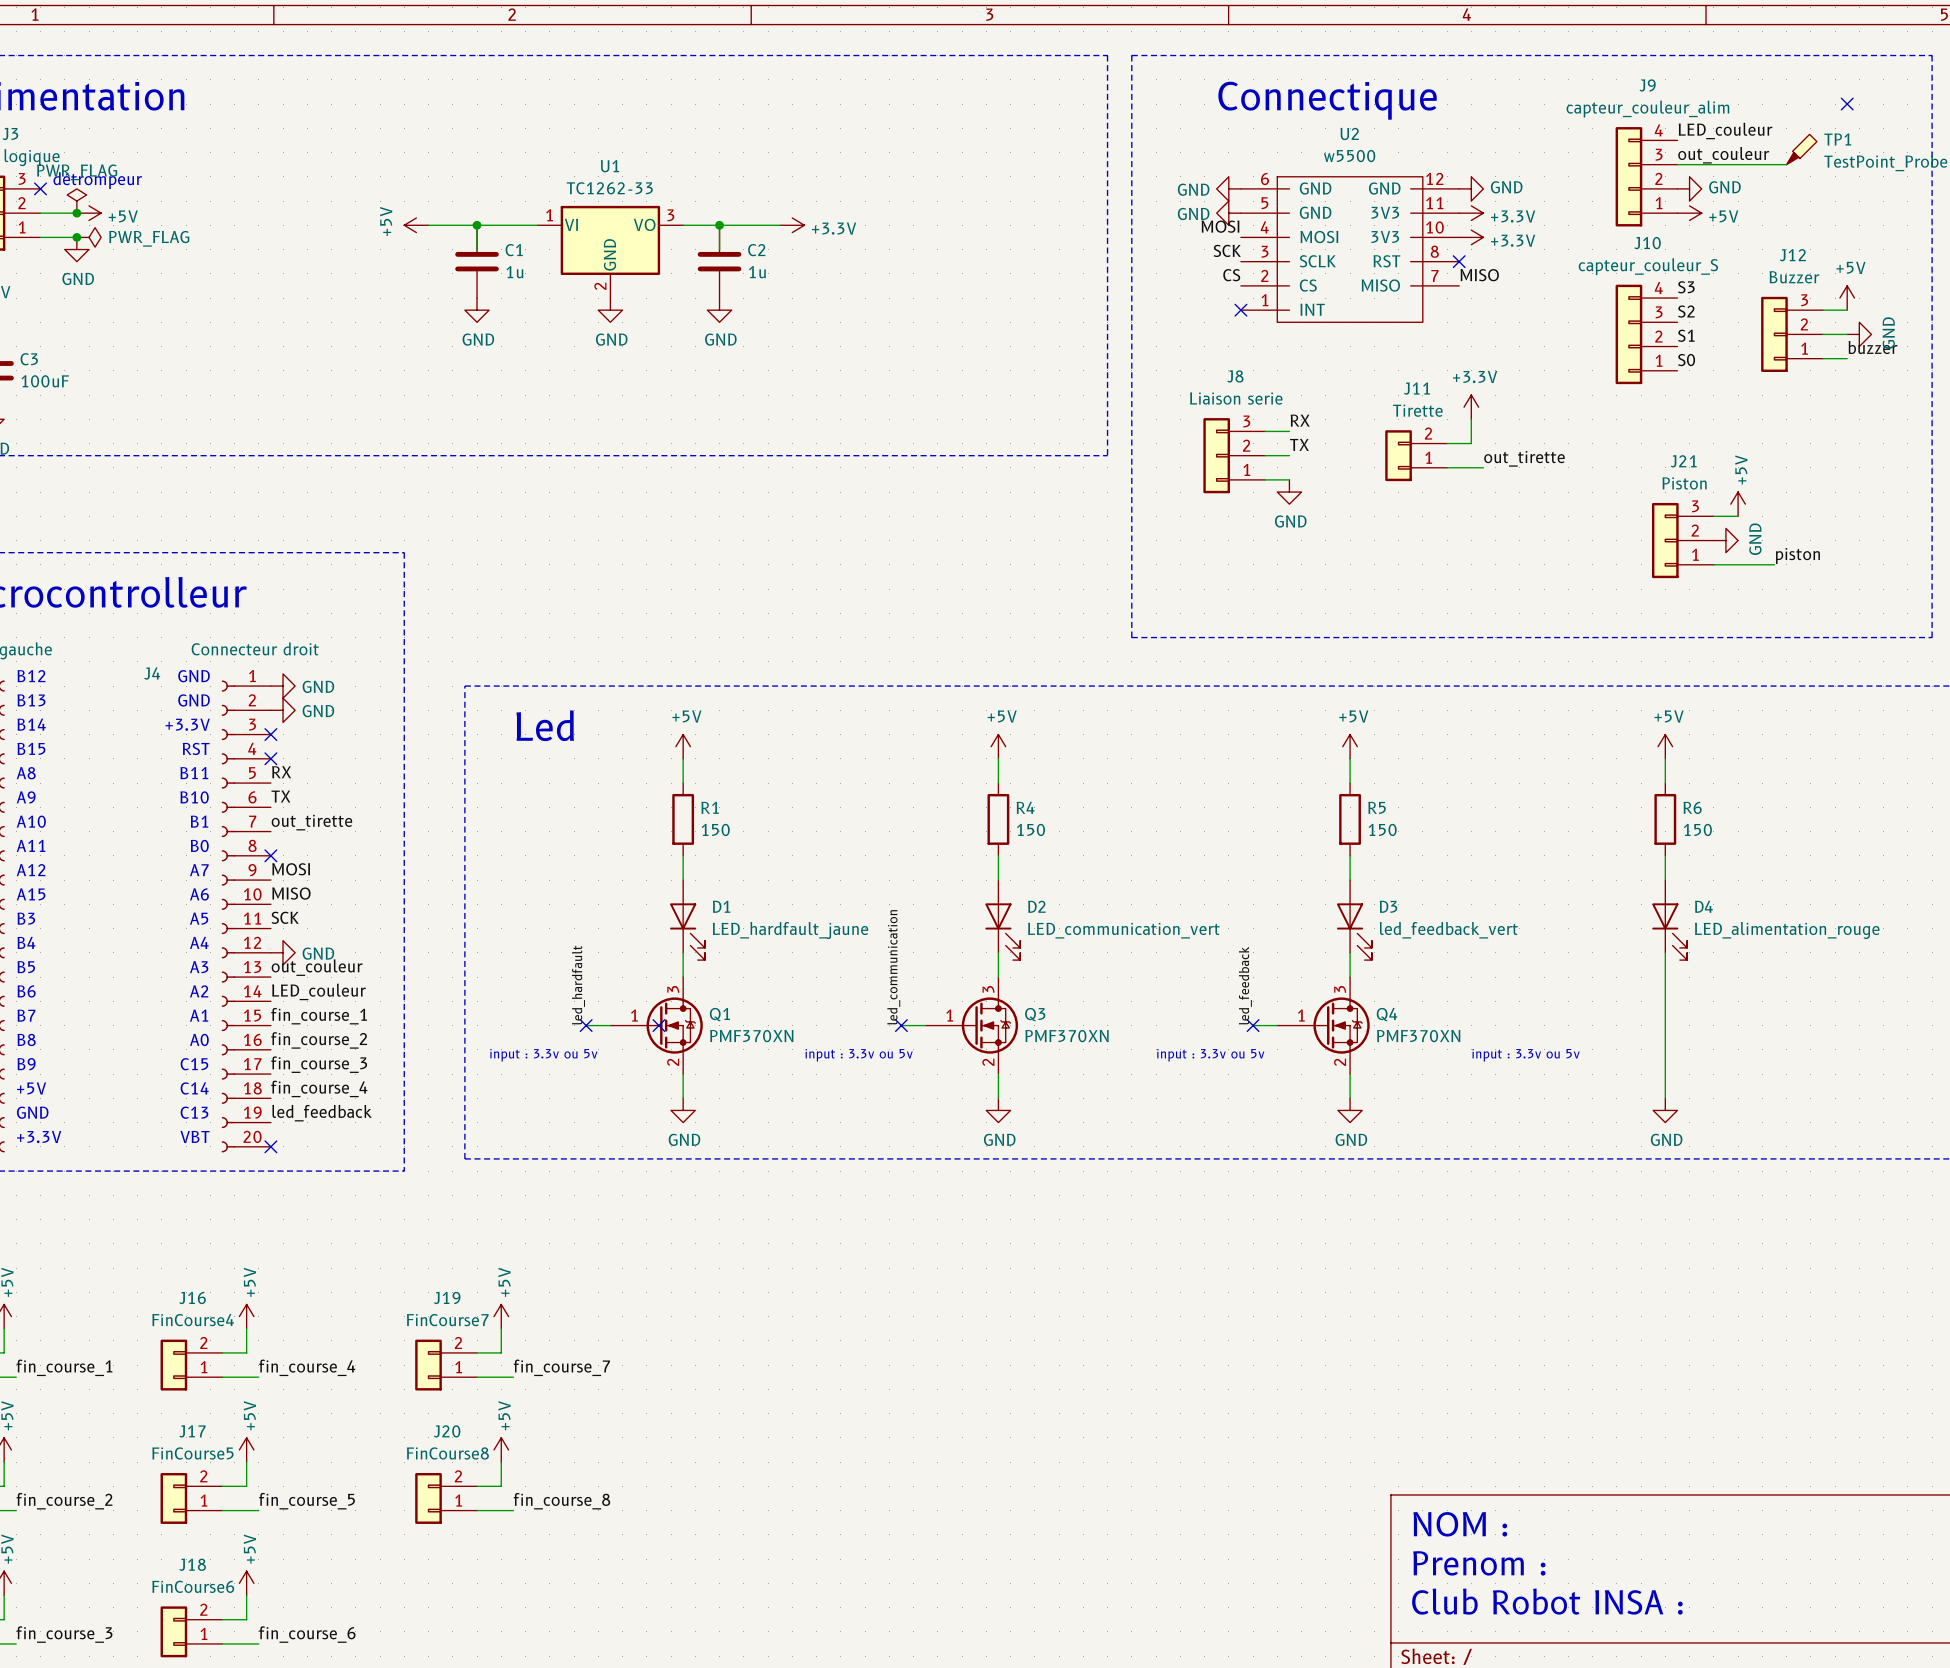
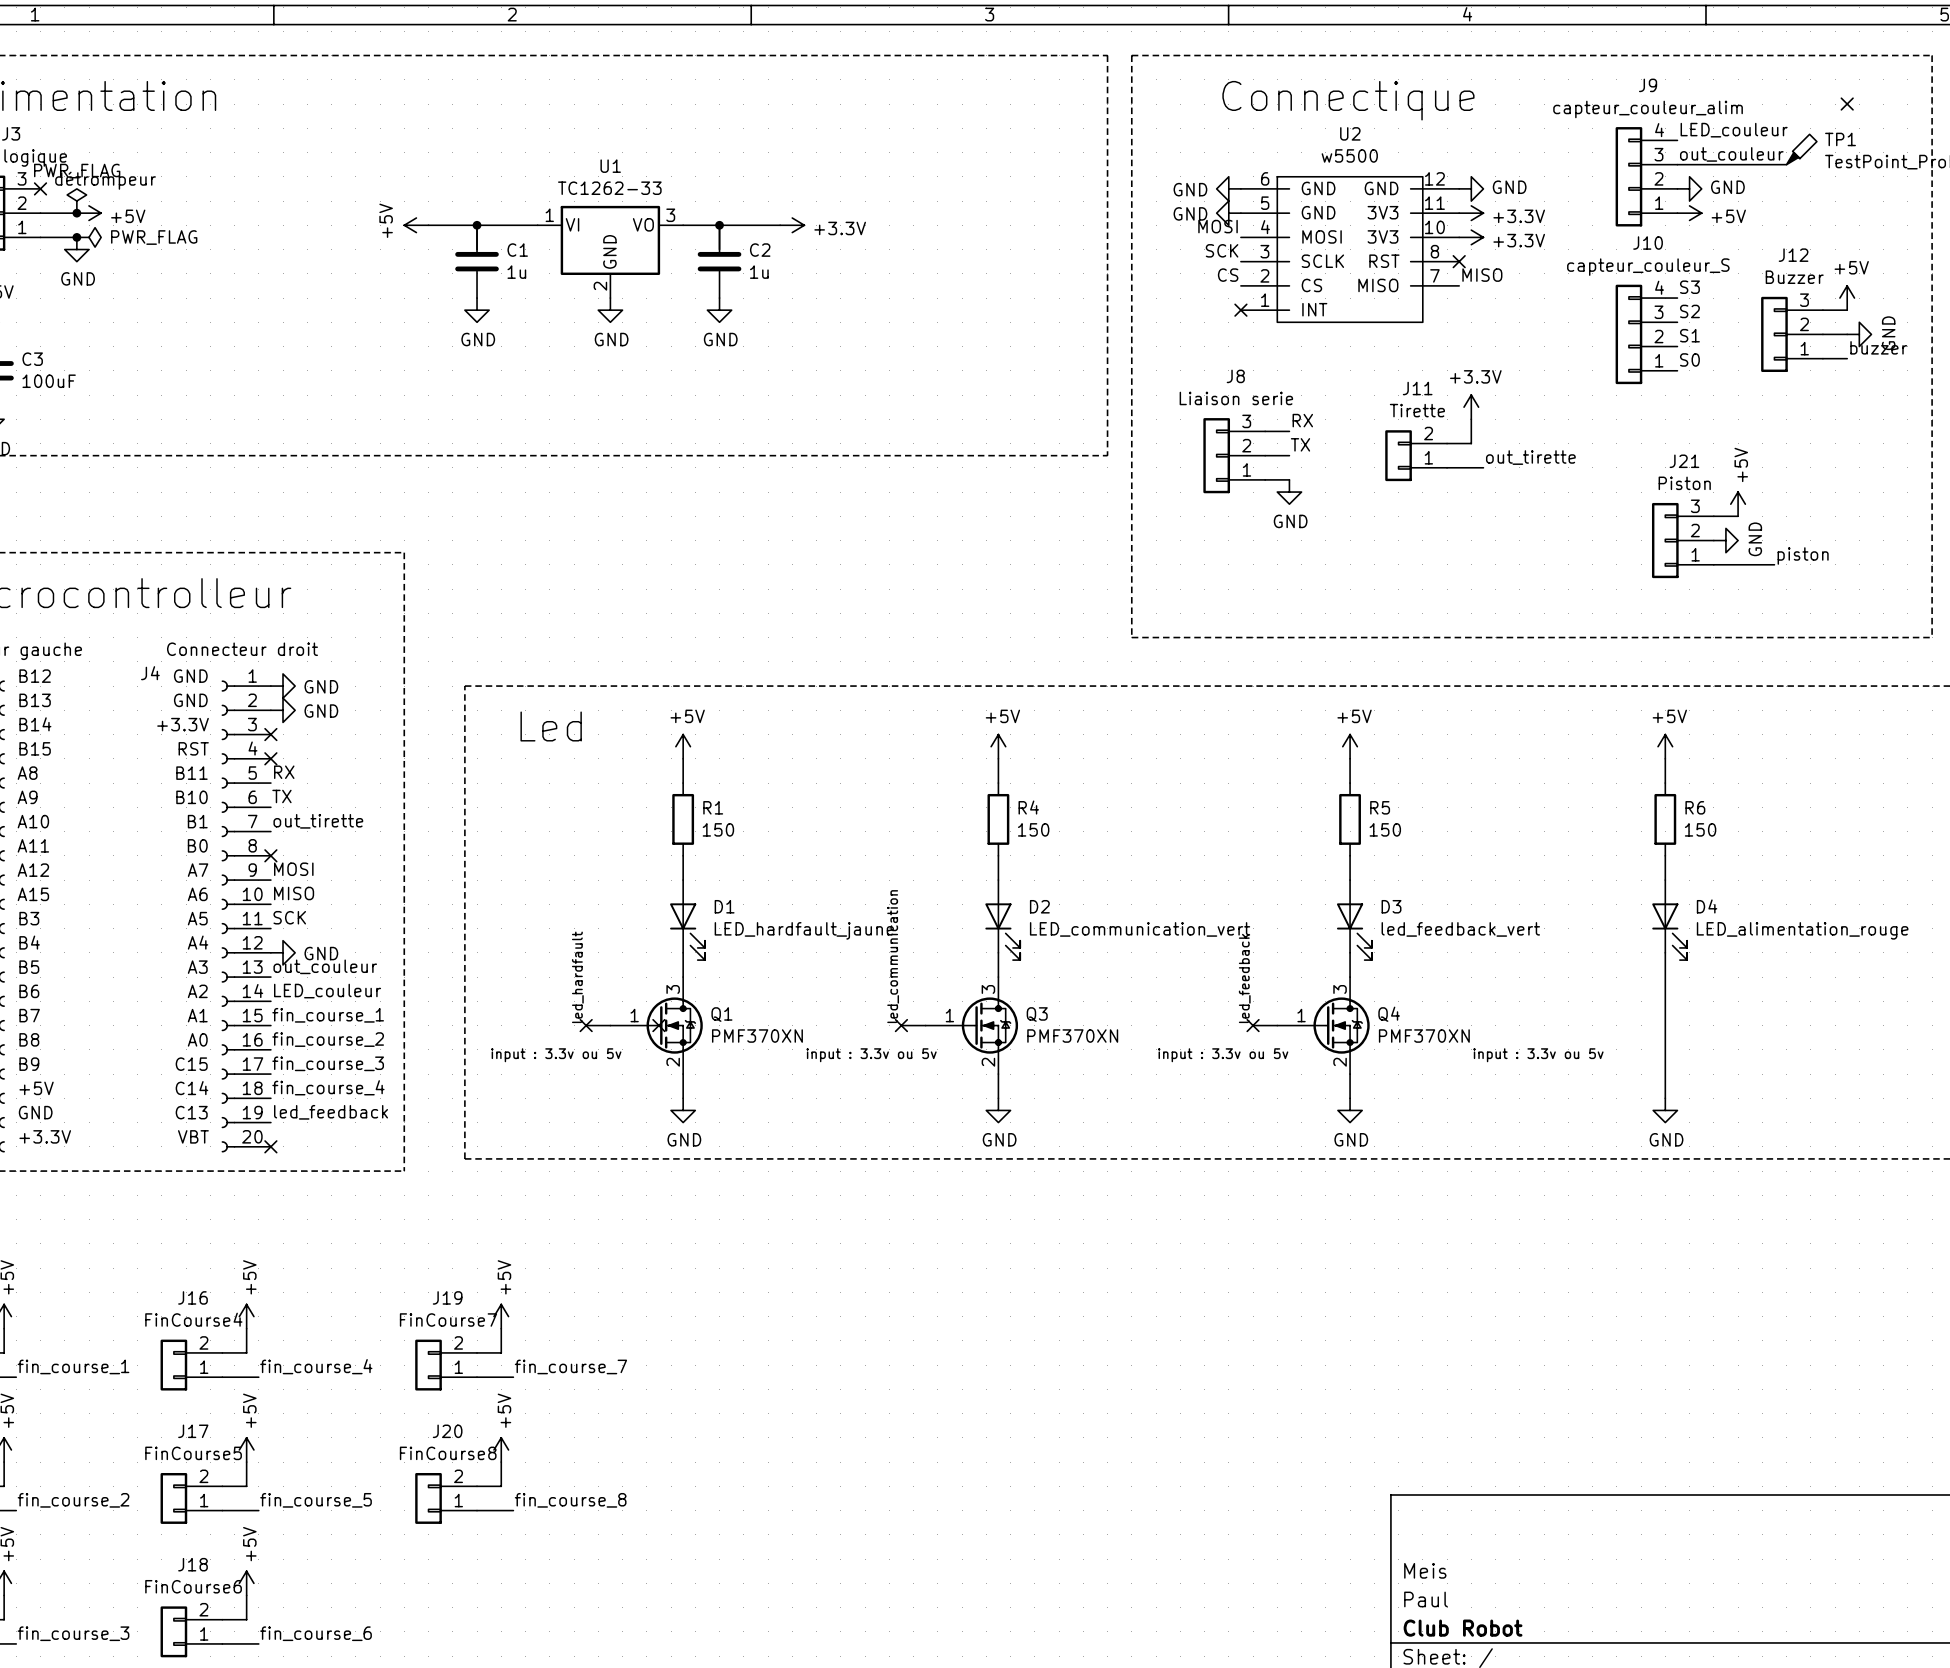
text: NOM : (1460, 1524) -> none
text: Prenom : (1479, 1563) -> none
title block: none -> Meis (1425, 1570)
title block: none -> Paul (1425, 1599)
text: Club Robot INSA : (1547, 1601) -> none
title block: none -> Club Robot (1463, 1628)

